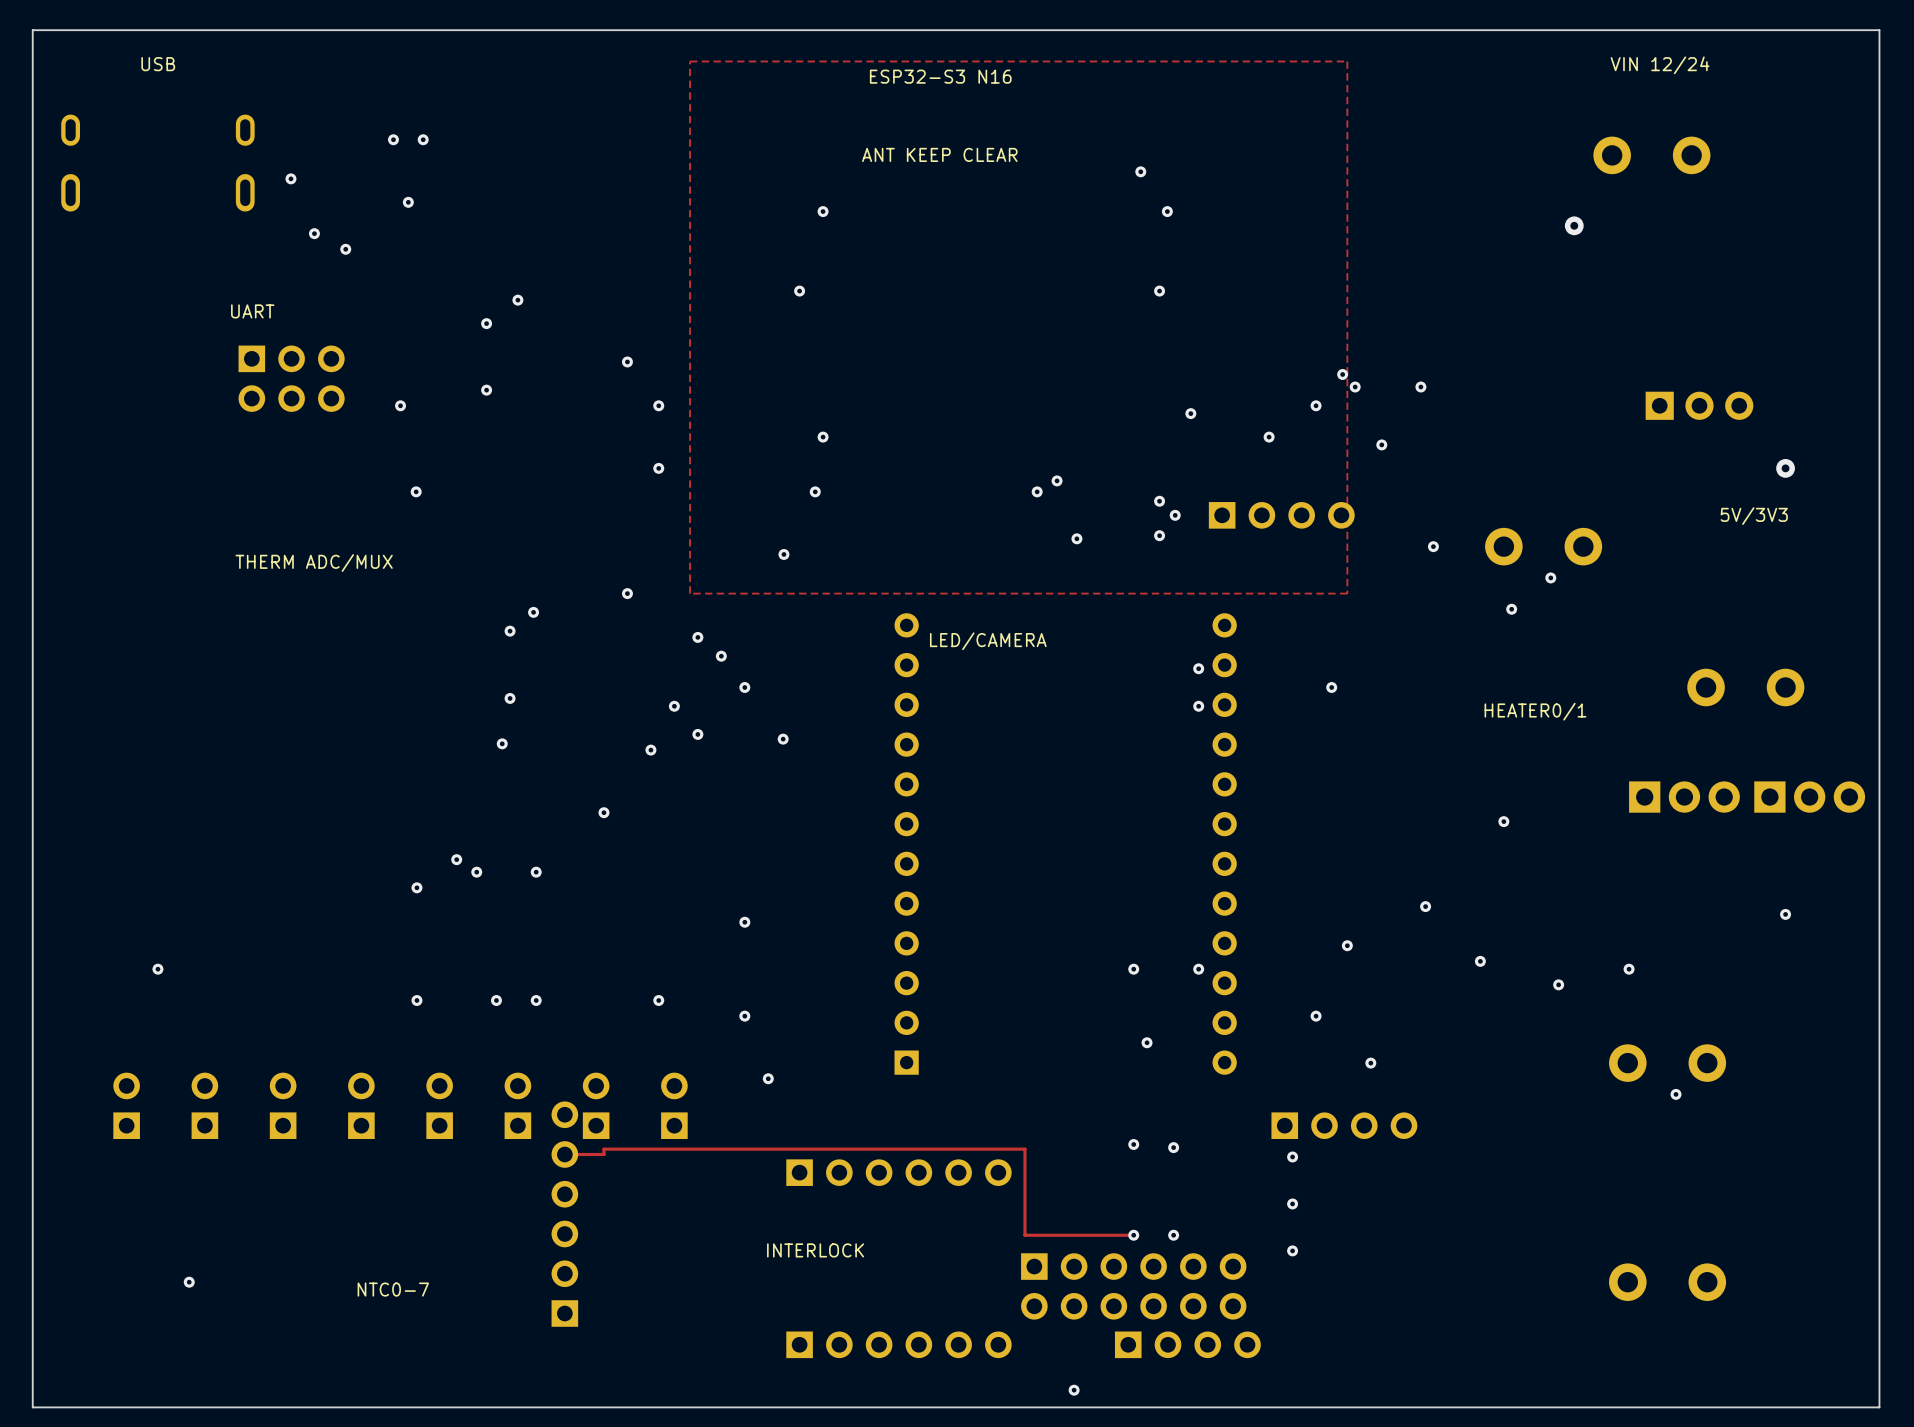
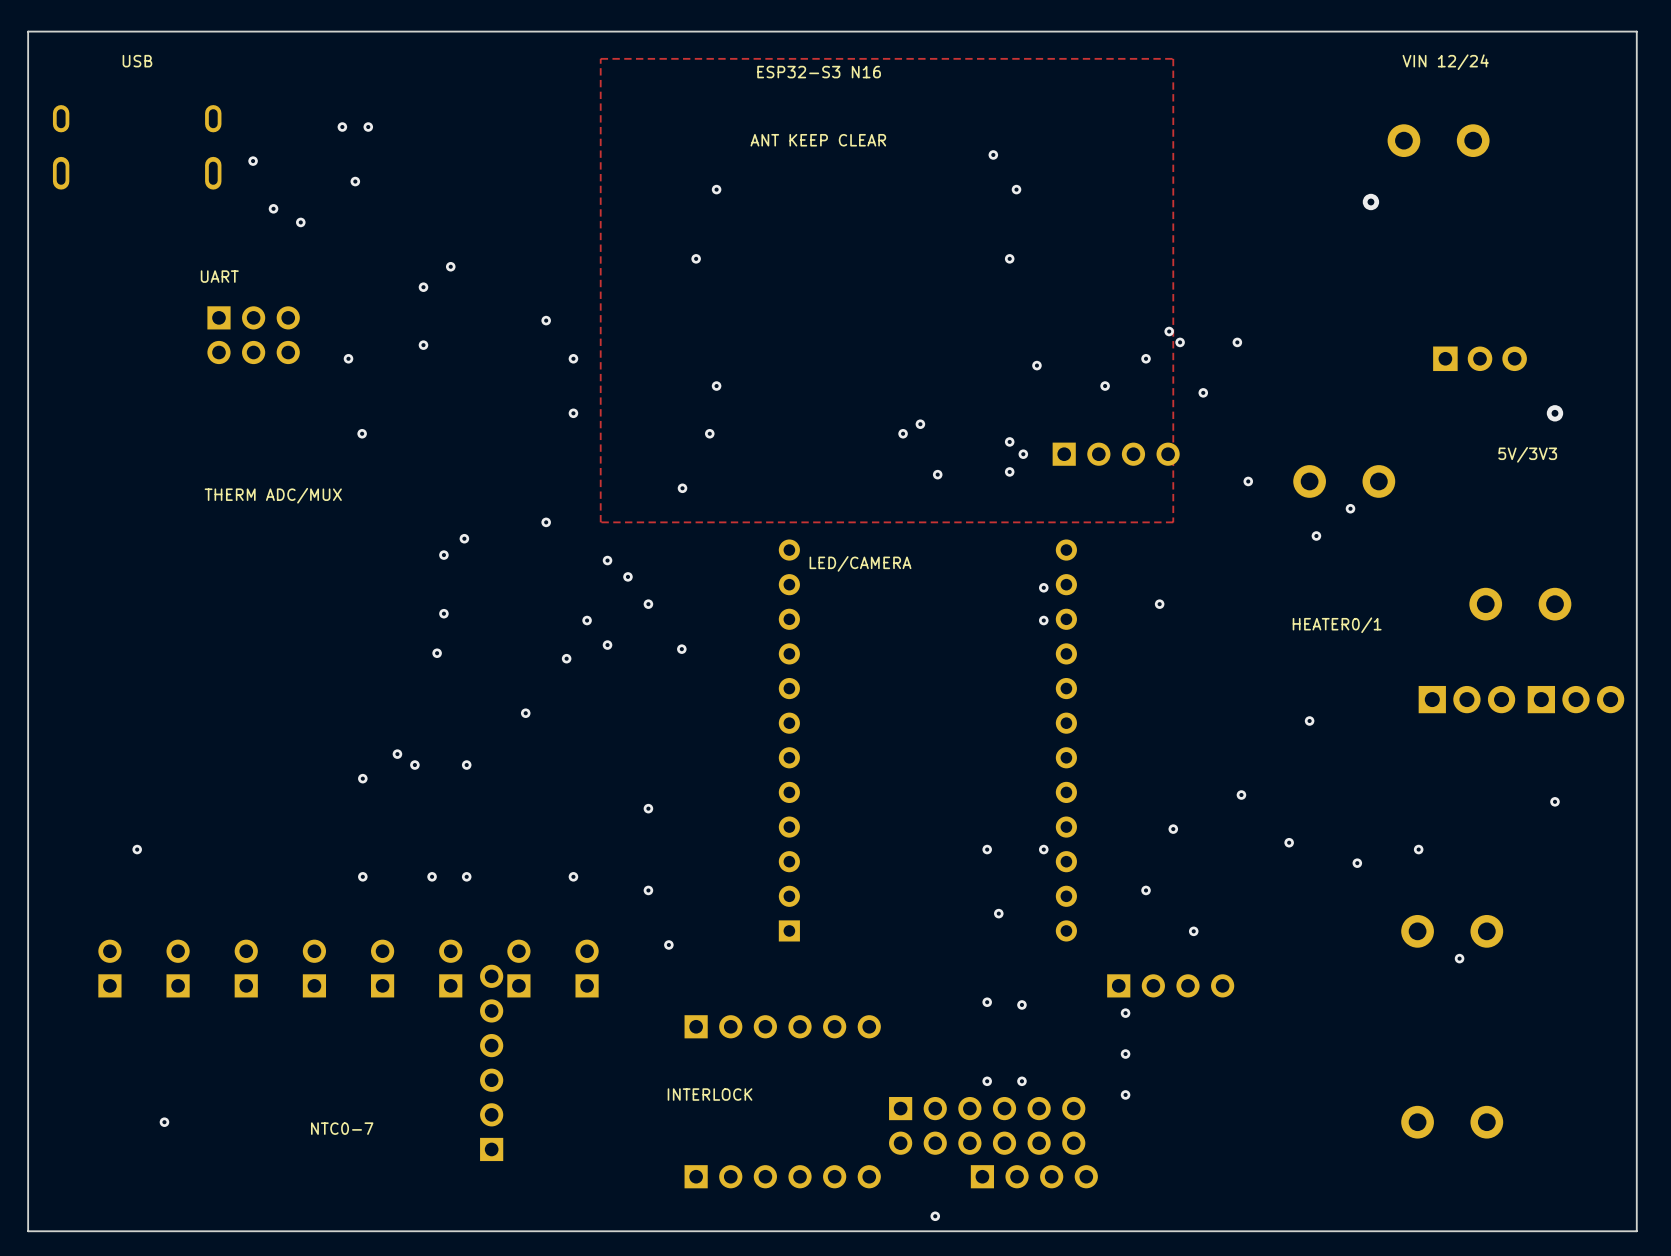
track: (564, 1154) (603, 1154) (603, 1149) (1024, 1149) (1024, 1235) (1133, 1235) -> none

